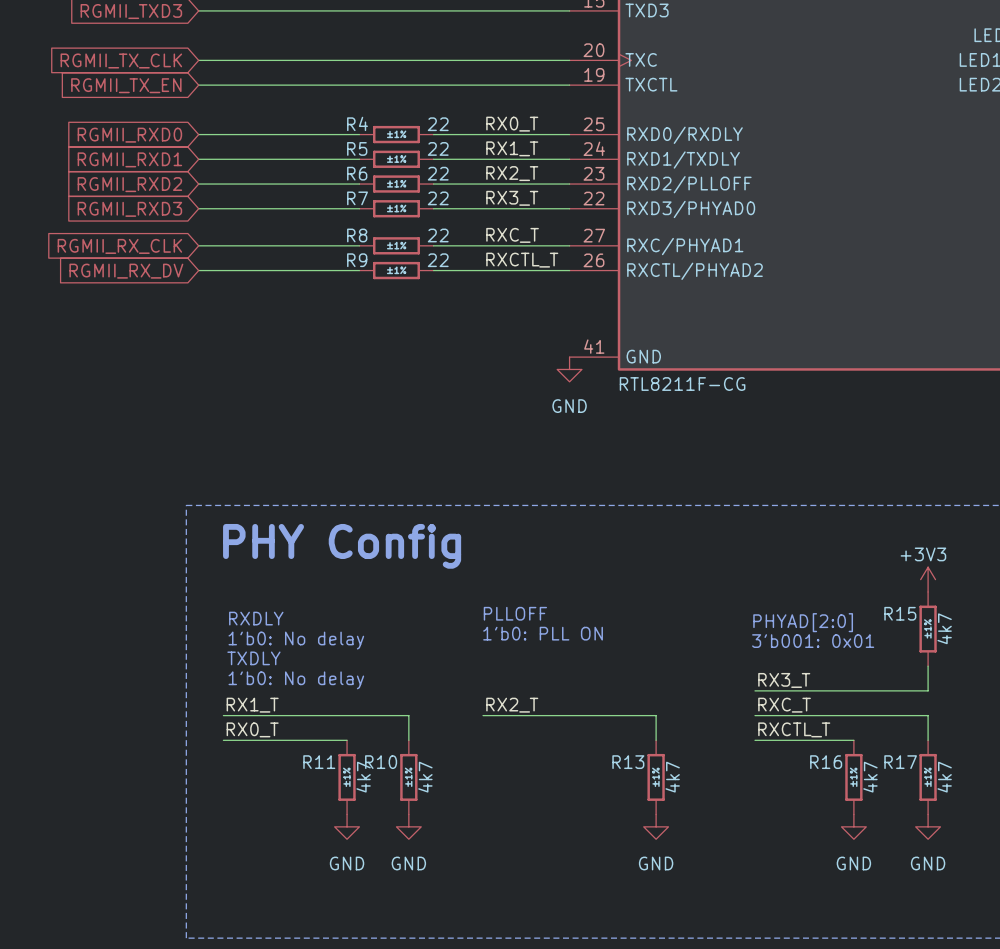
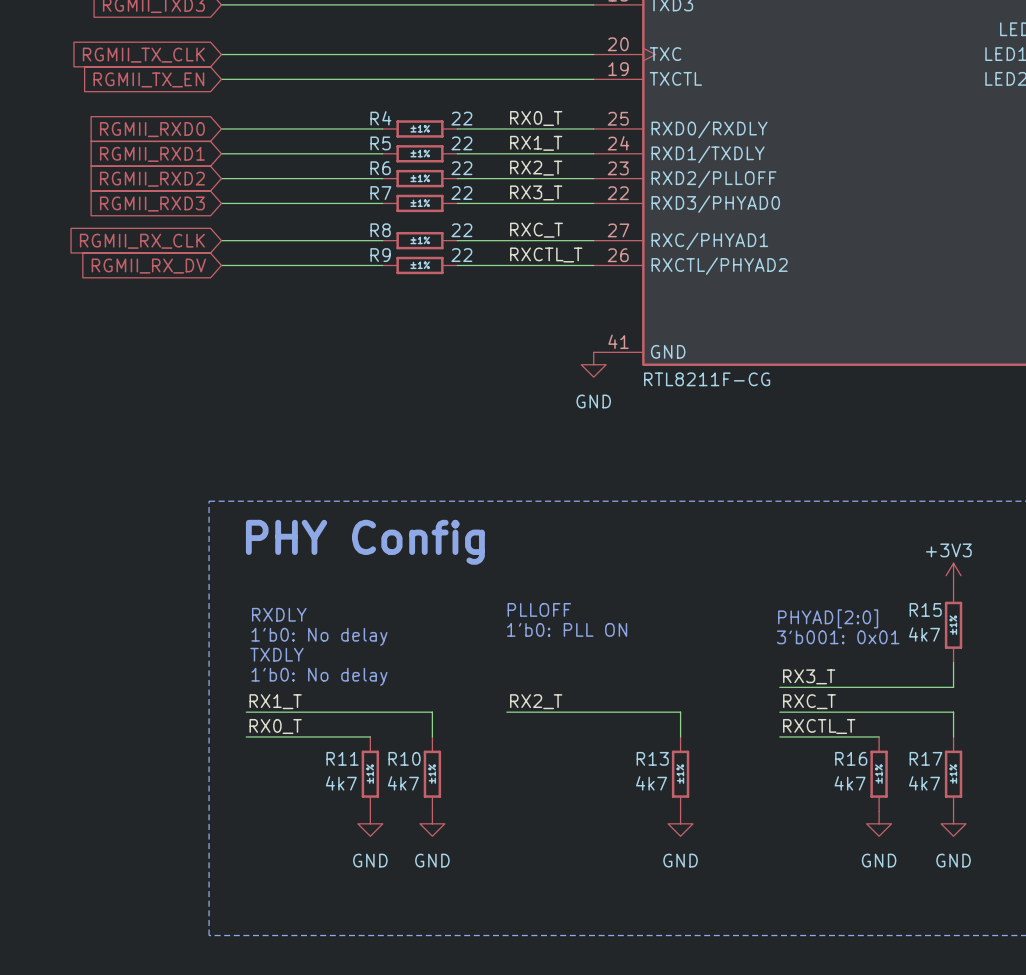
R15 text rotation: 0° (944, 628) -> 90° clockwise (924, 634)
R15 text position: 4k7 (944, 628) -> 4k7 (924, 634)
R11 text rotation: 0° (363, 777) -> 90° clockwise (341, 783)
R11 text position: 4k7 (363, 777) -> 4k7 (341, 783)
R10 text rotation: 0° (425, 777) -> 90° clockwise (403, 783)
R10 text position: 4k7 (425, 777) -> 4k7 (403, 783)
R13 text rotation: 0° (672, 777) -> 90° clockwise (651, 783)
R13 text position: 4k7 (672, 777) -> 4k7 (651, 783)
R16 text rotation: 0° (870, 777) -> 90° clockwise (850, 783)
R16 text position: 4k7 (870, 777) -> 4k7 (850, 783)
R17 text rotation: 0° (944, 777) -> 90° clockwise (924, 783)
R17 text position: 4k7 (944, 777) -> 4k7 (924, 783)

